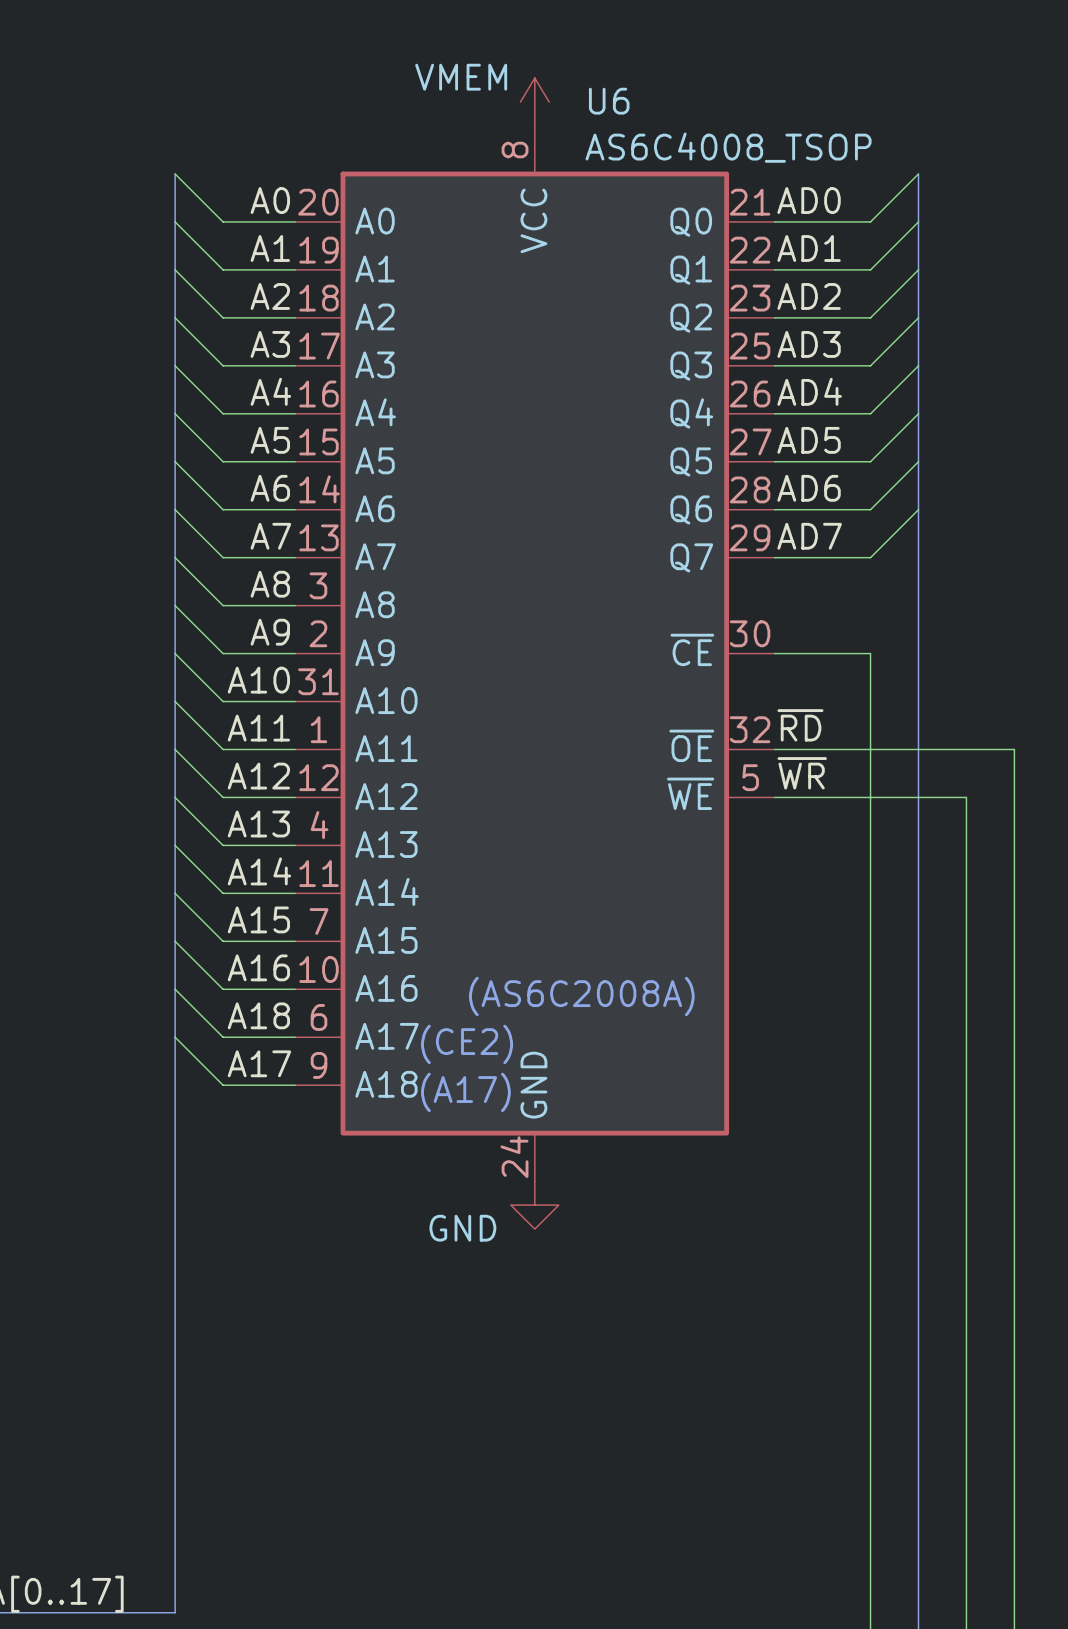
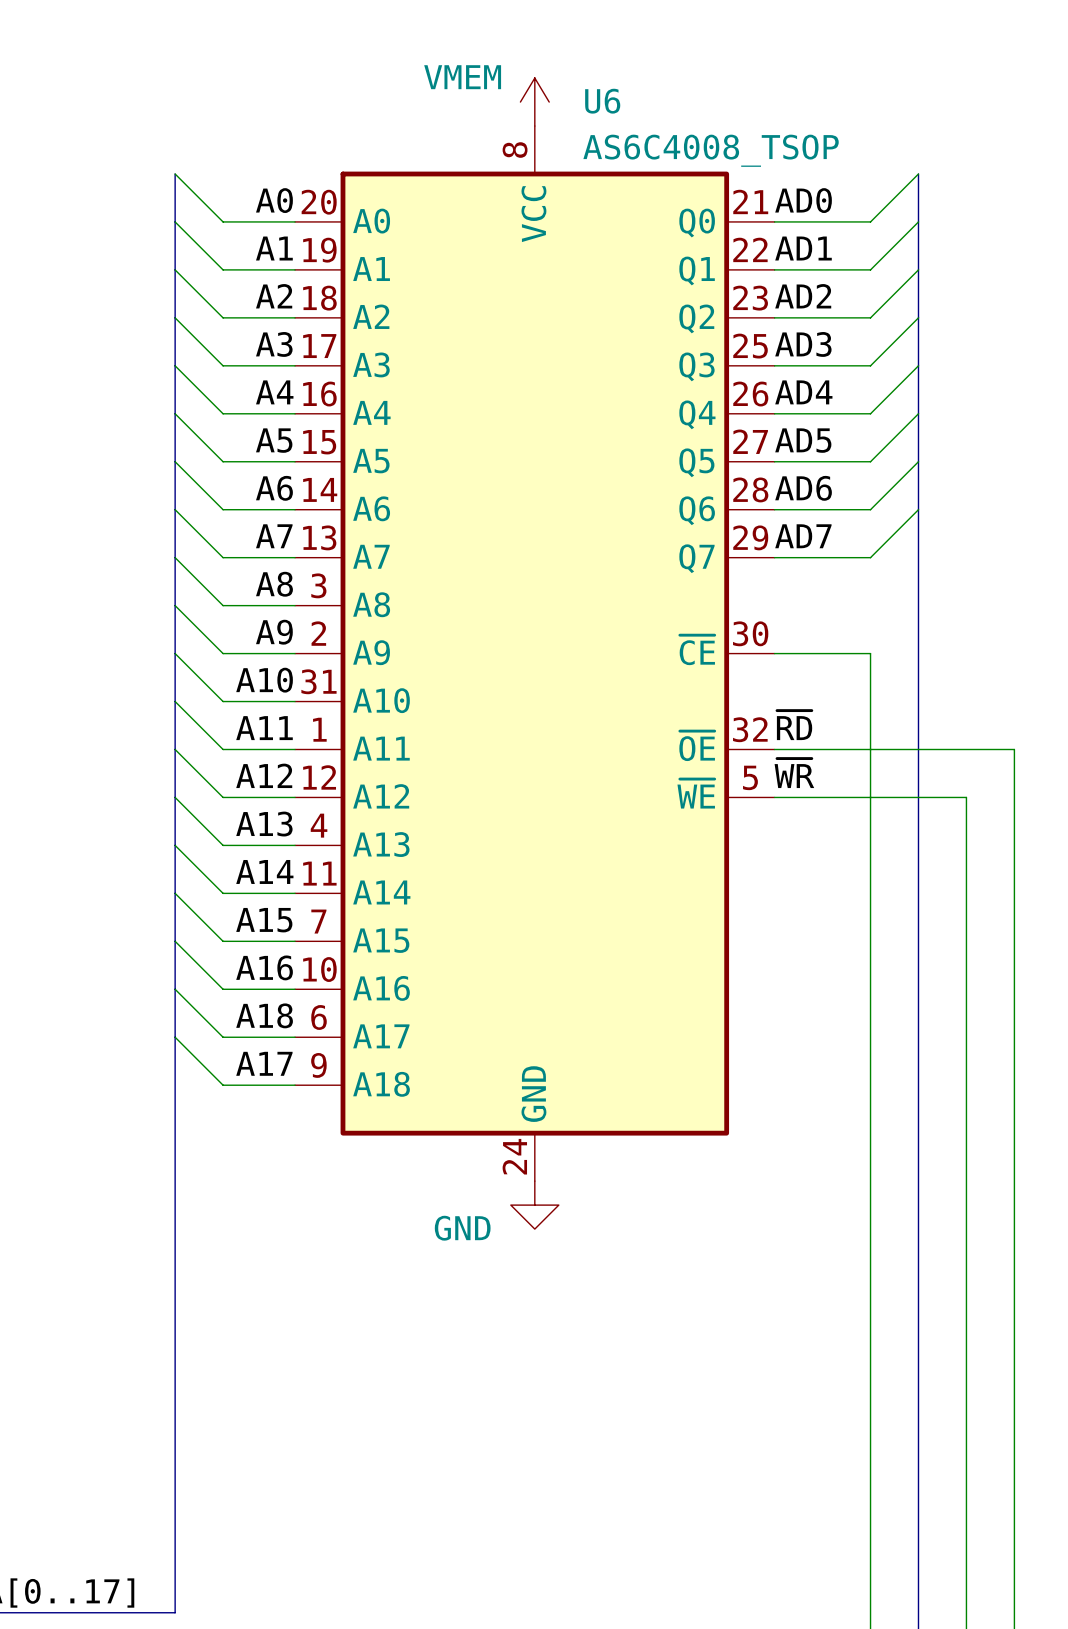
text: (AS6C2008A) (581, 996) -> none
text: (CE2) (467, 1044) -> none
text: (A17) (465, 1092) -> none

